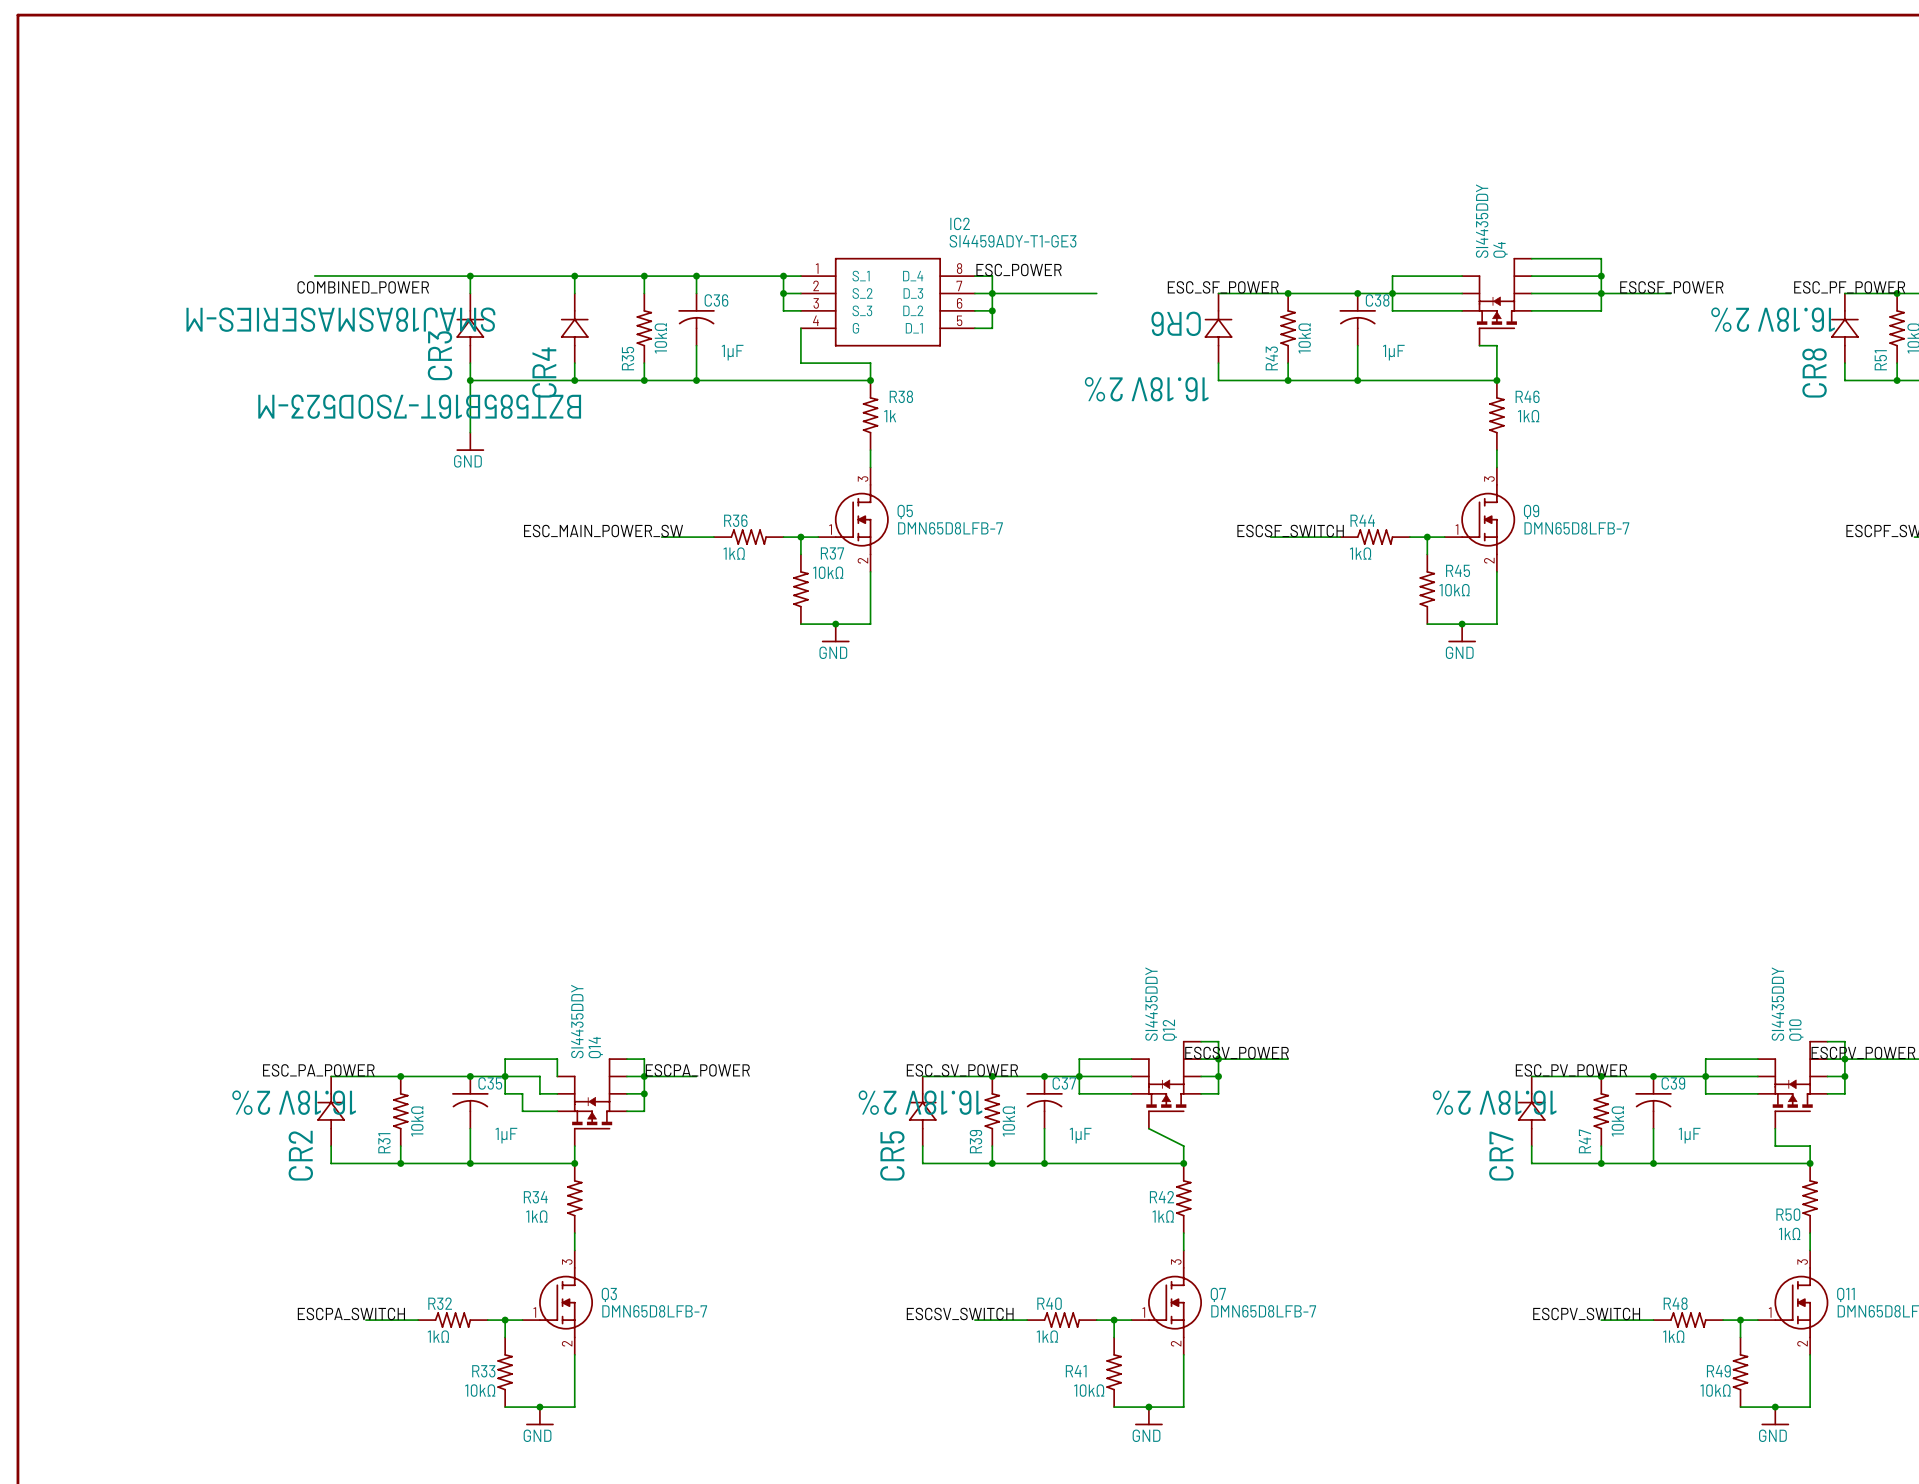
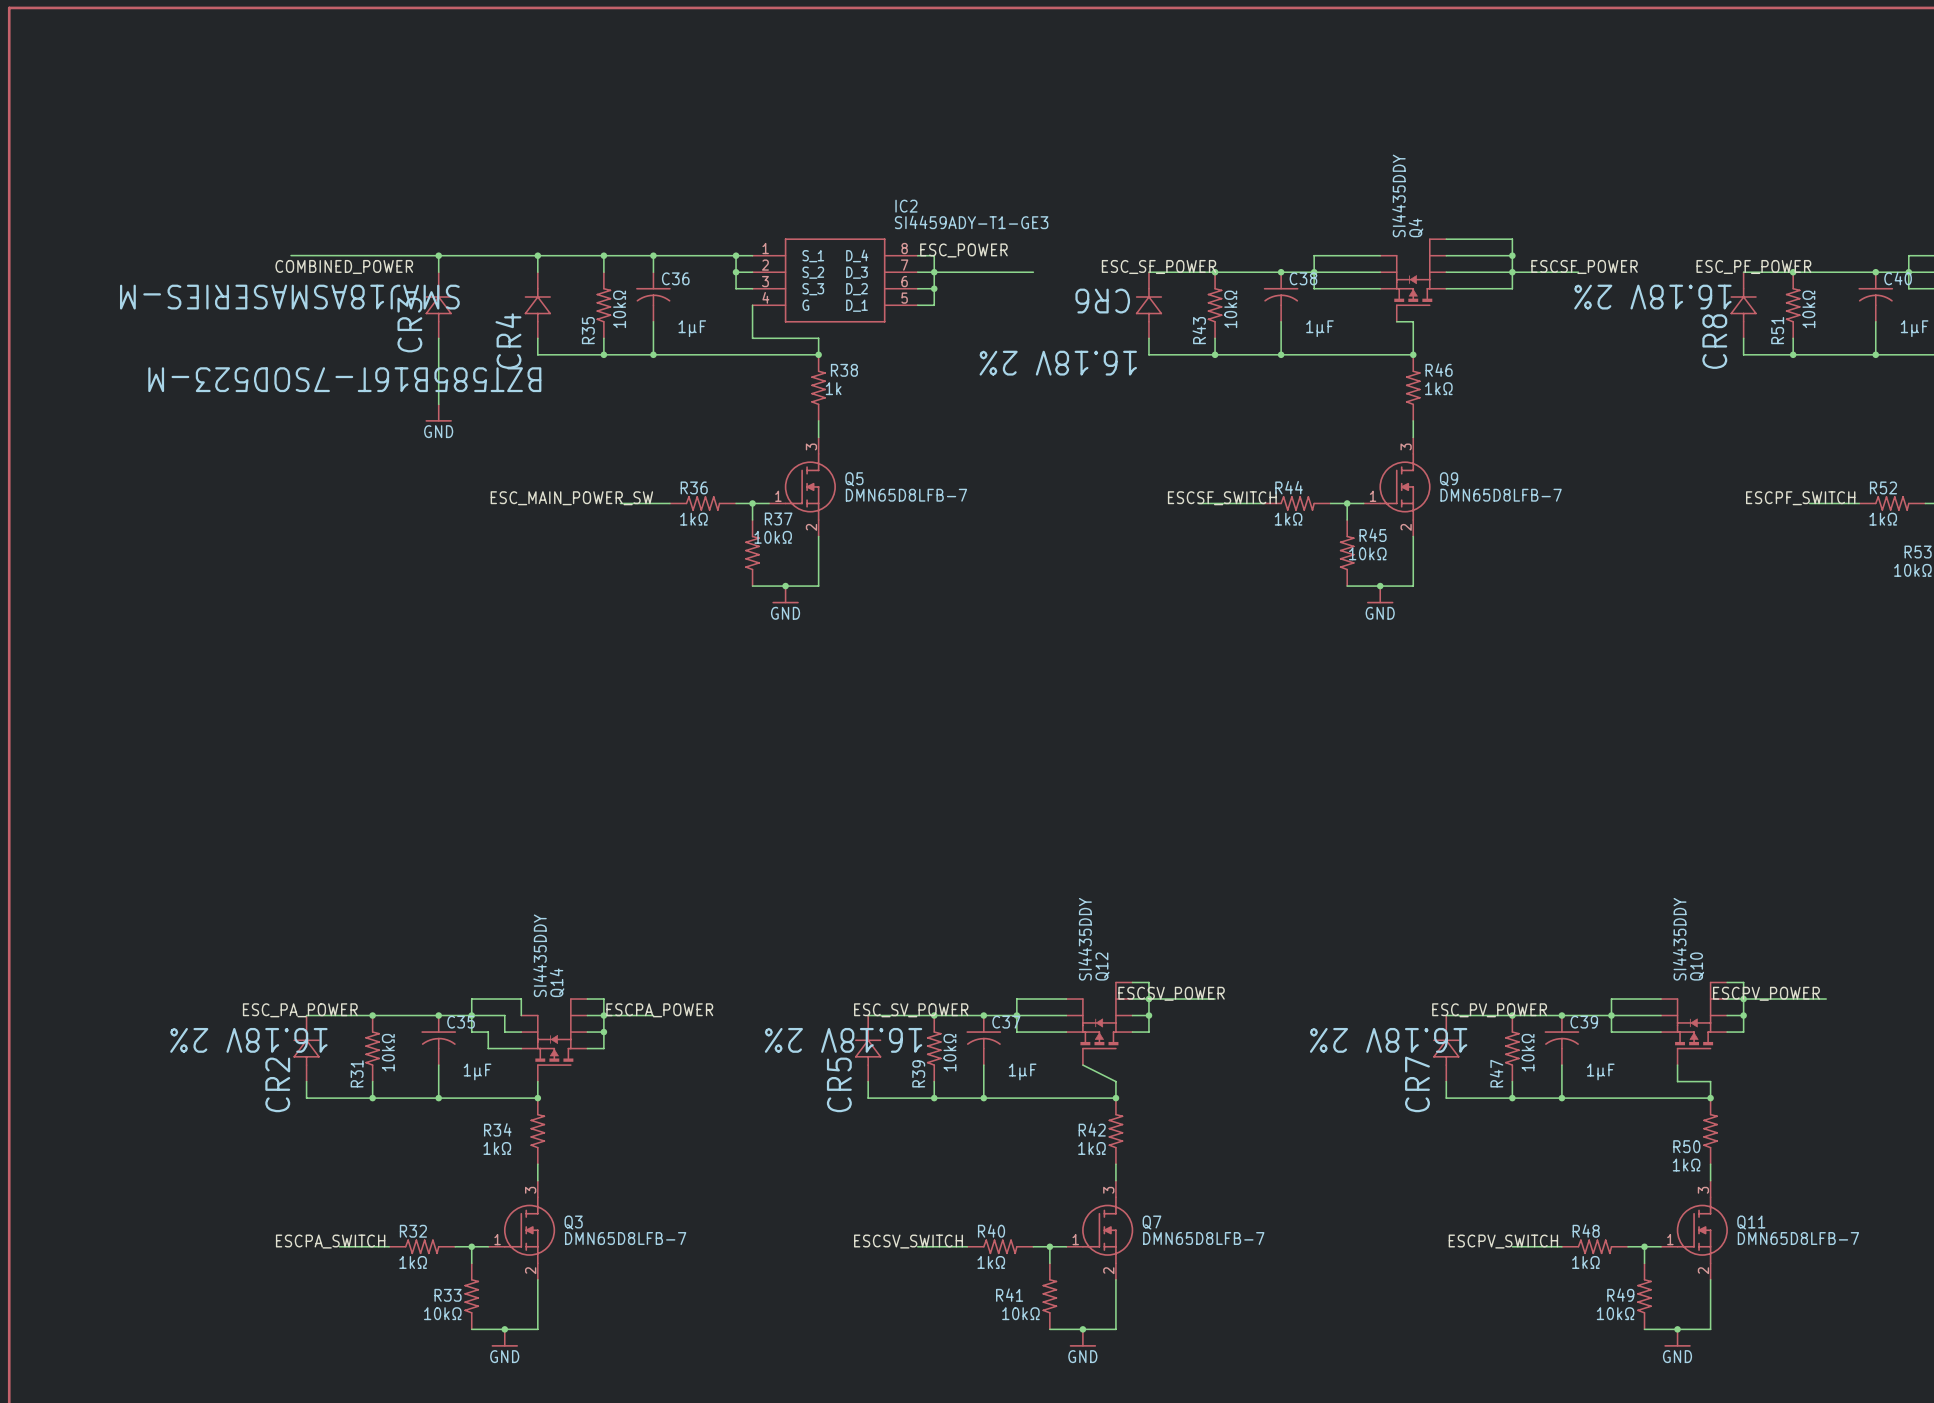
wire: (470, 380) (574, 380) -> none
junction: (470, 380) -> none
junction: (574, 380) -> none

